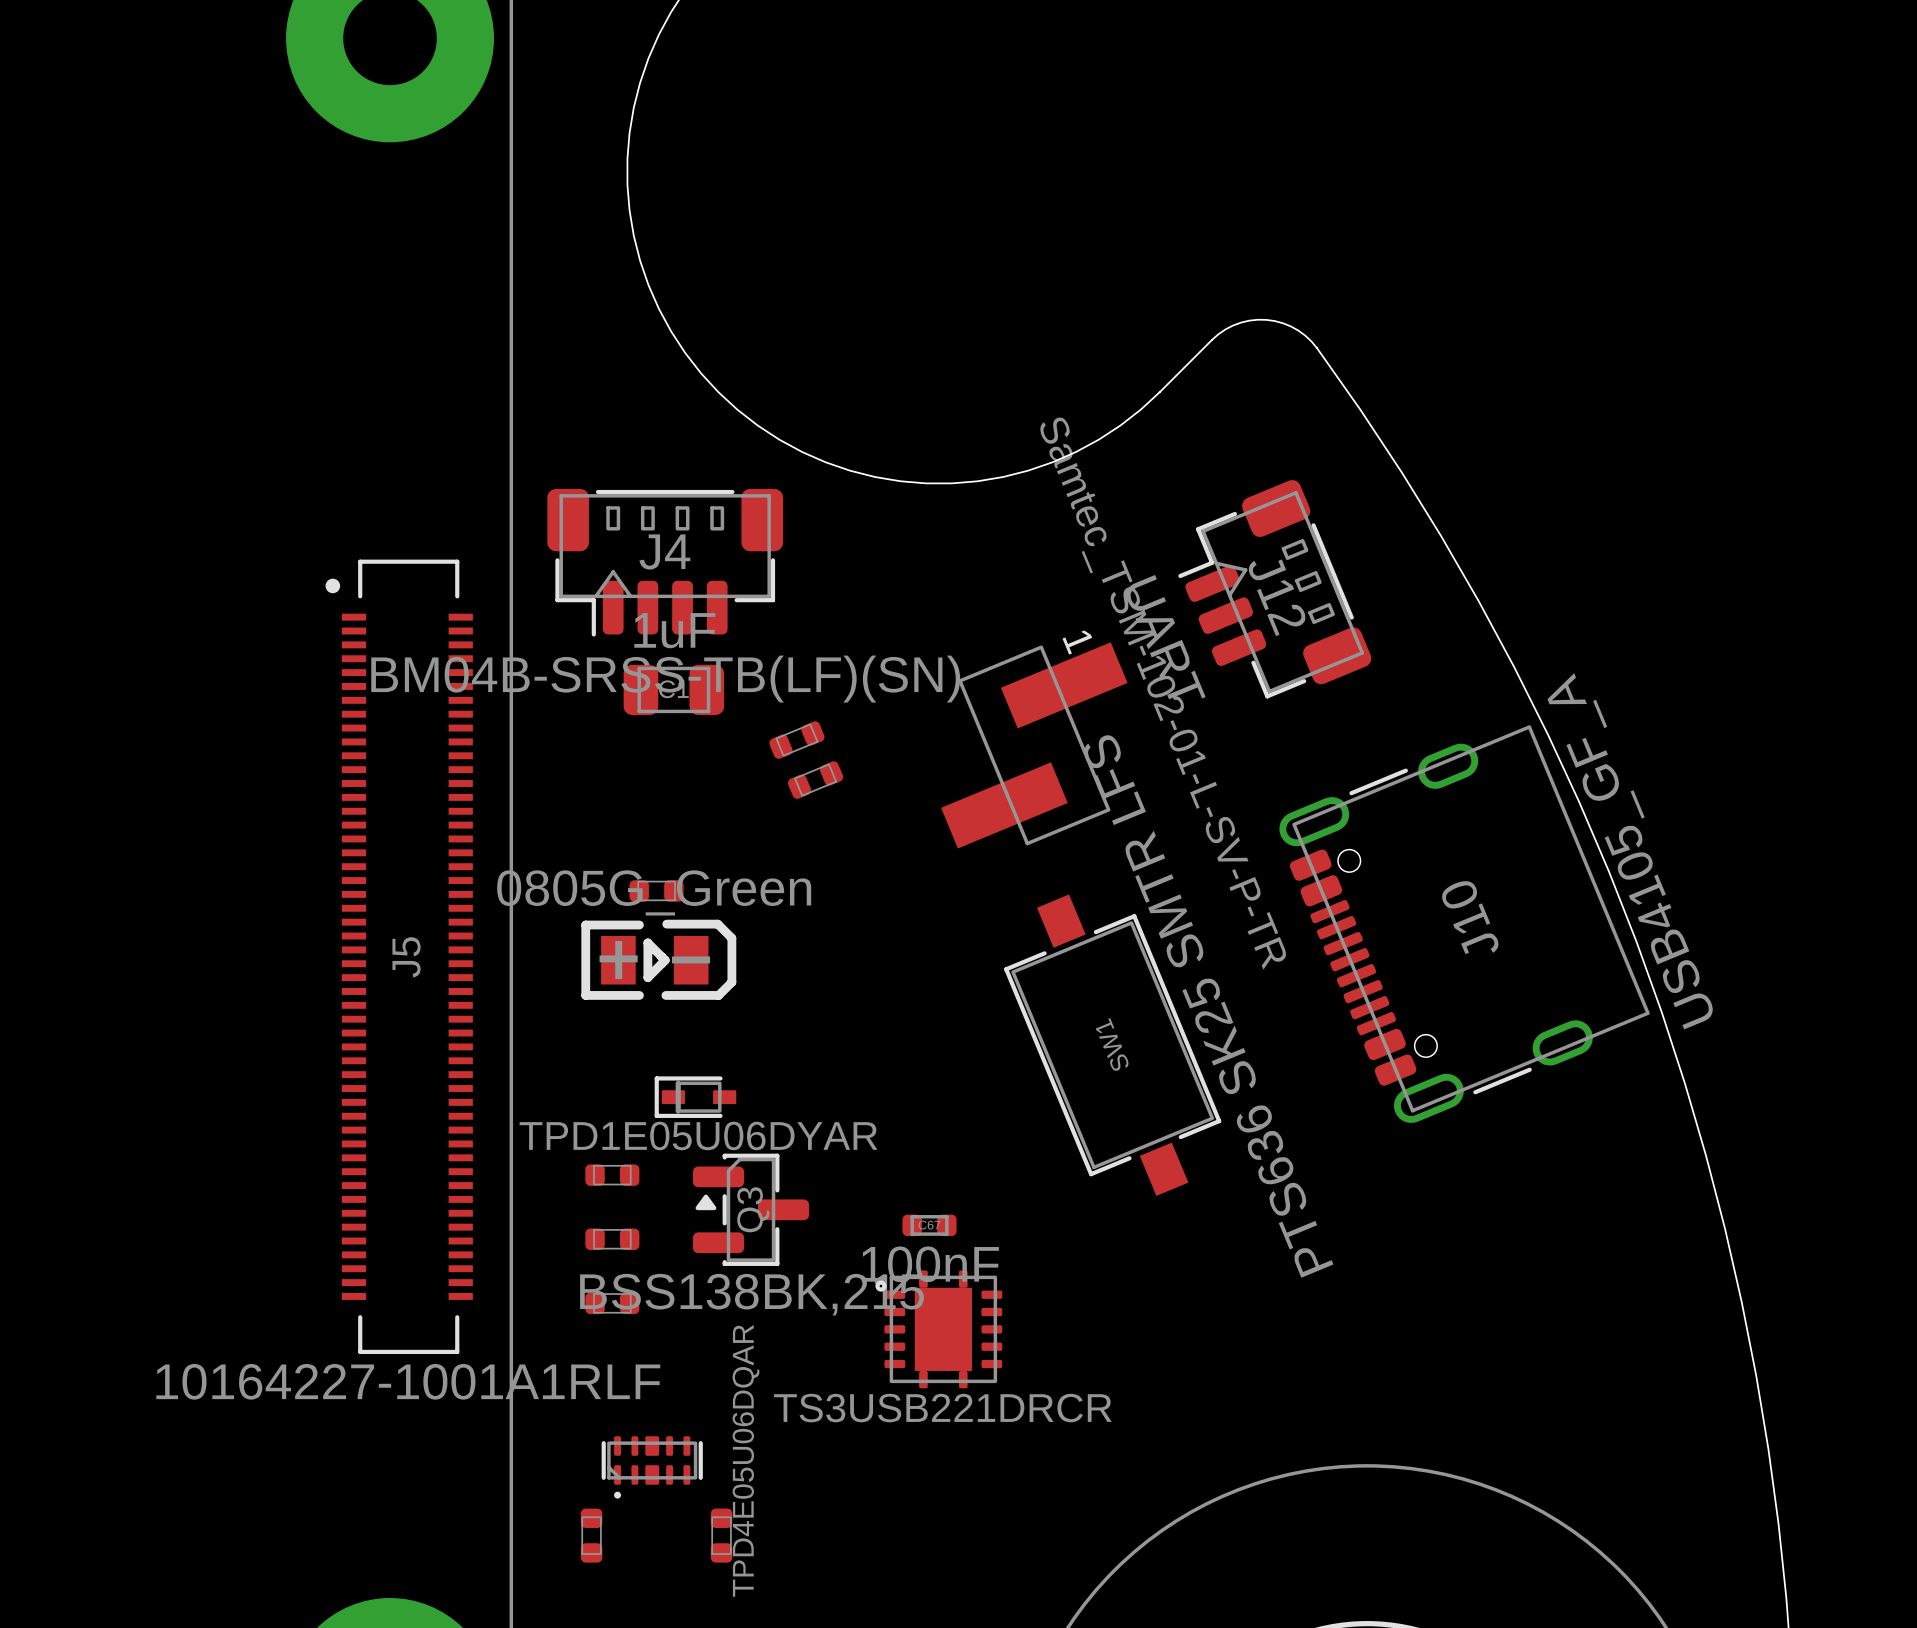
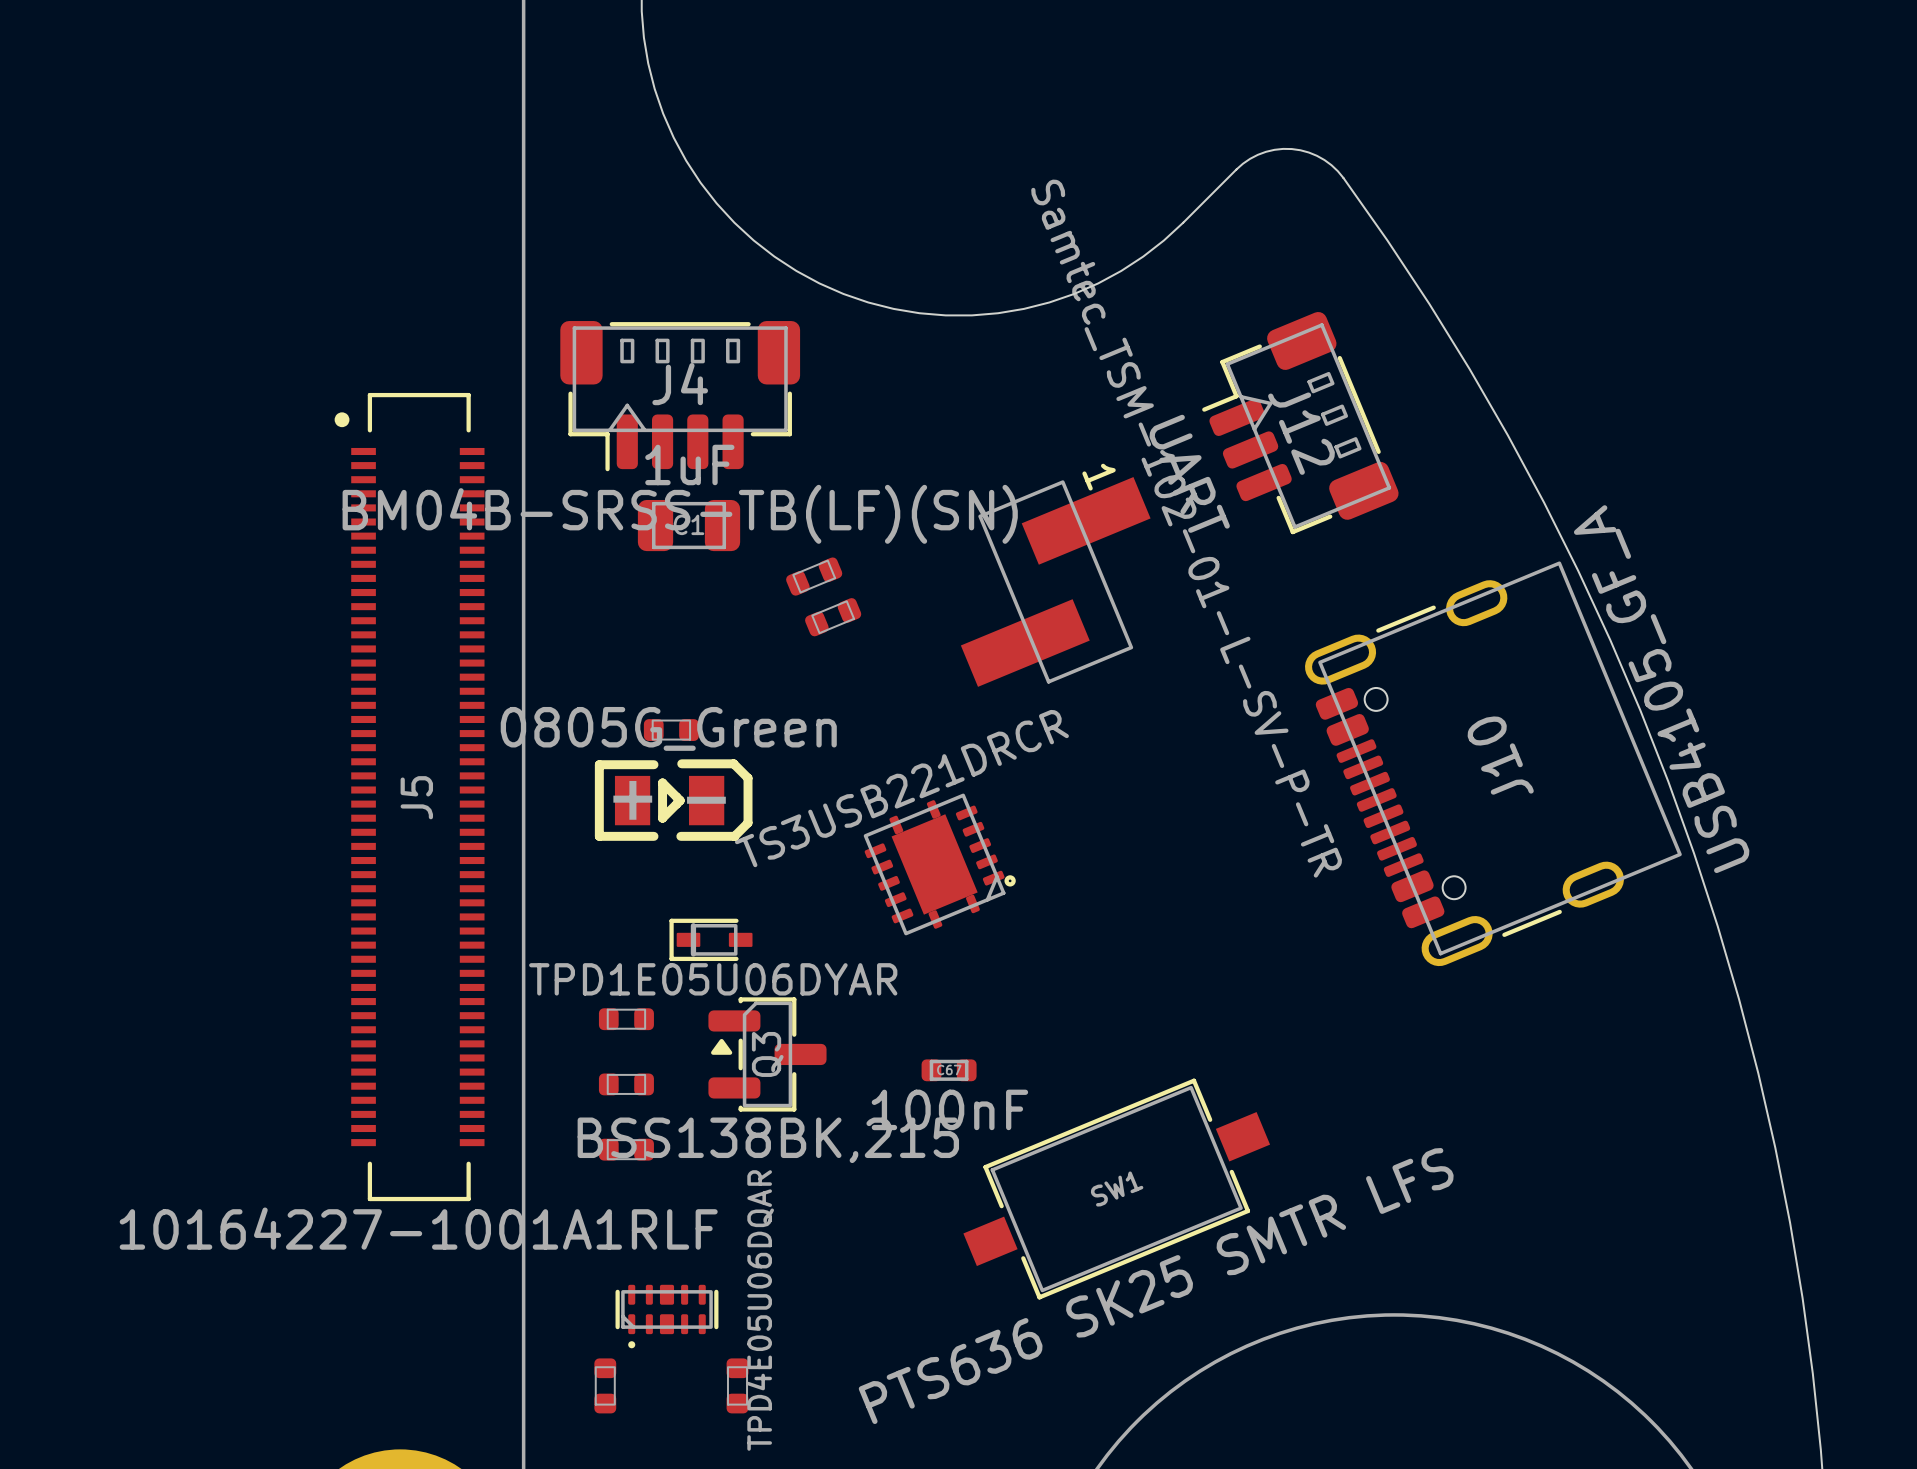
part: none -> TS3USB221DRCR (939, 864)
SW1 rotation: 0° (1112, 1045) -> 90° clockwise (1116, 1189)
SW1 position: (1112, 1045) -> (1116, 1189)
part: TS3USB221DRCR (938, 1329) -> none

